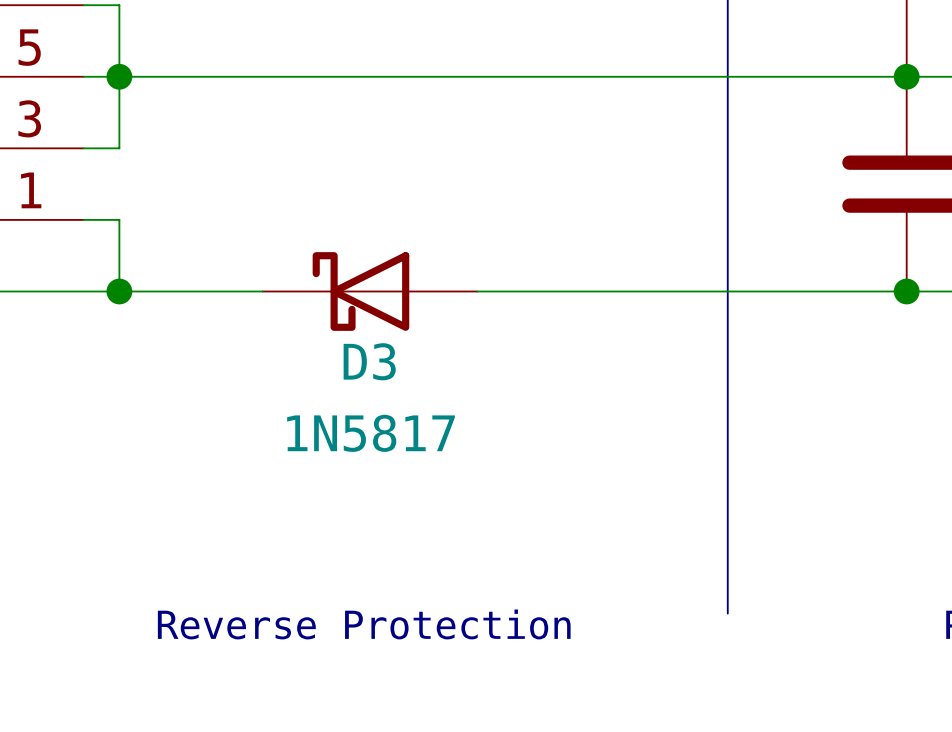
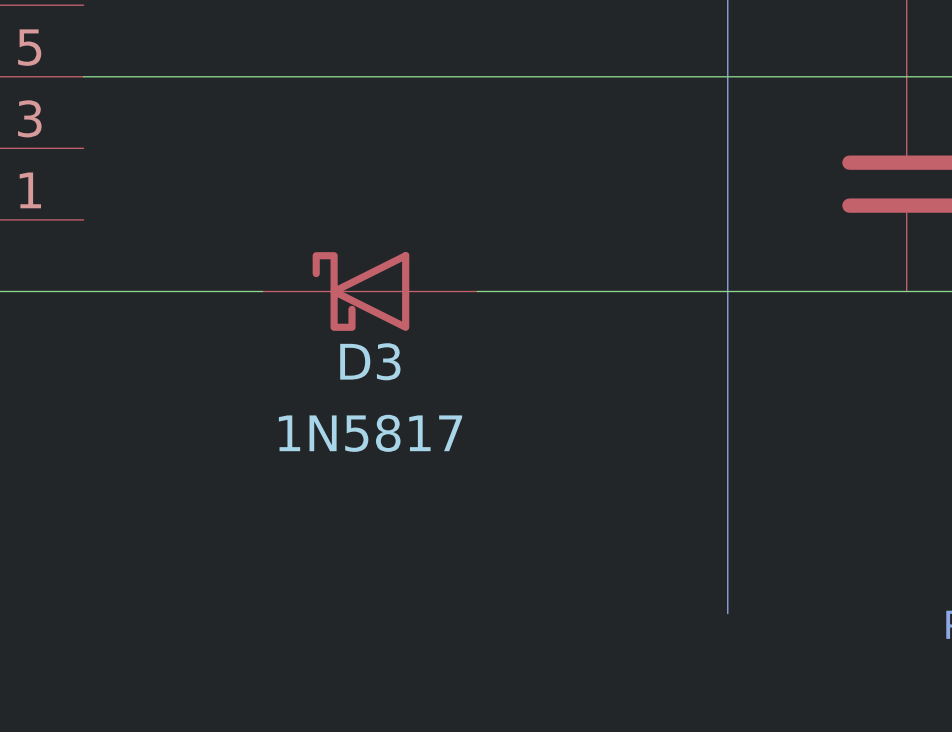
wire: (83, 5) (119, 5) (119, 148) (83, 148) -> none
junction: (119, 76) -> none
junction: (906, 76) -> none
wire: (83, 219) (119, 219) (119, 291) -> none
junction: (119, 291) -> none
junction: (906, 291) -> none
text: Reverse Protection (364, 624) -> none

